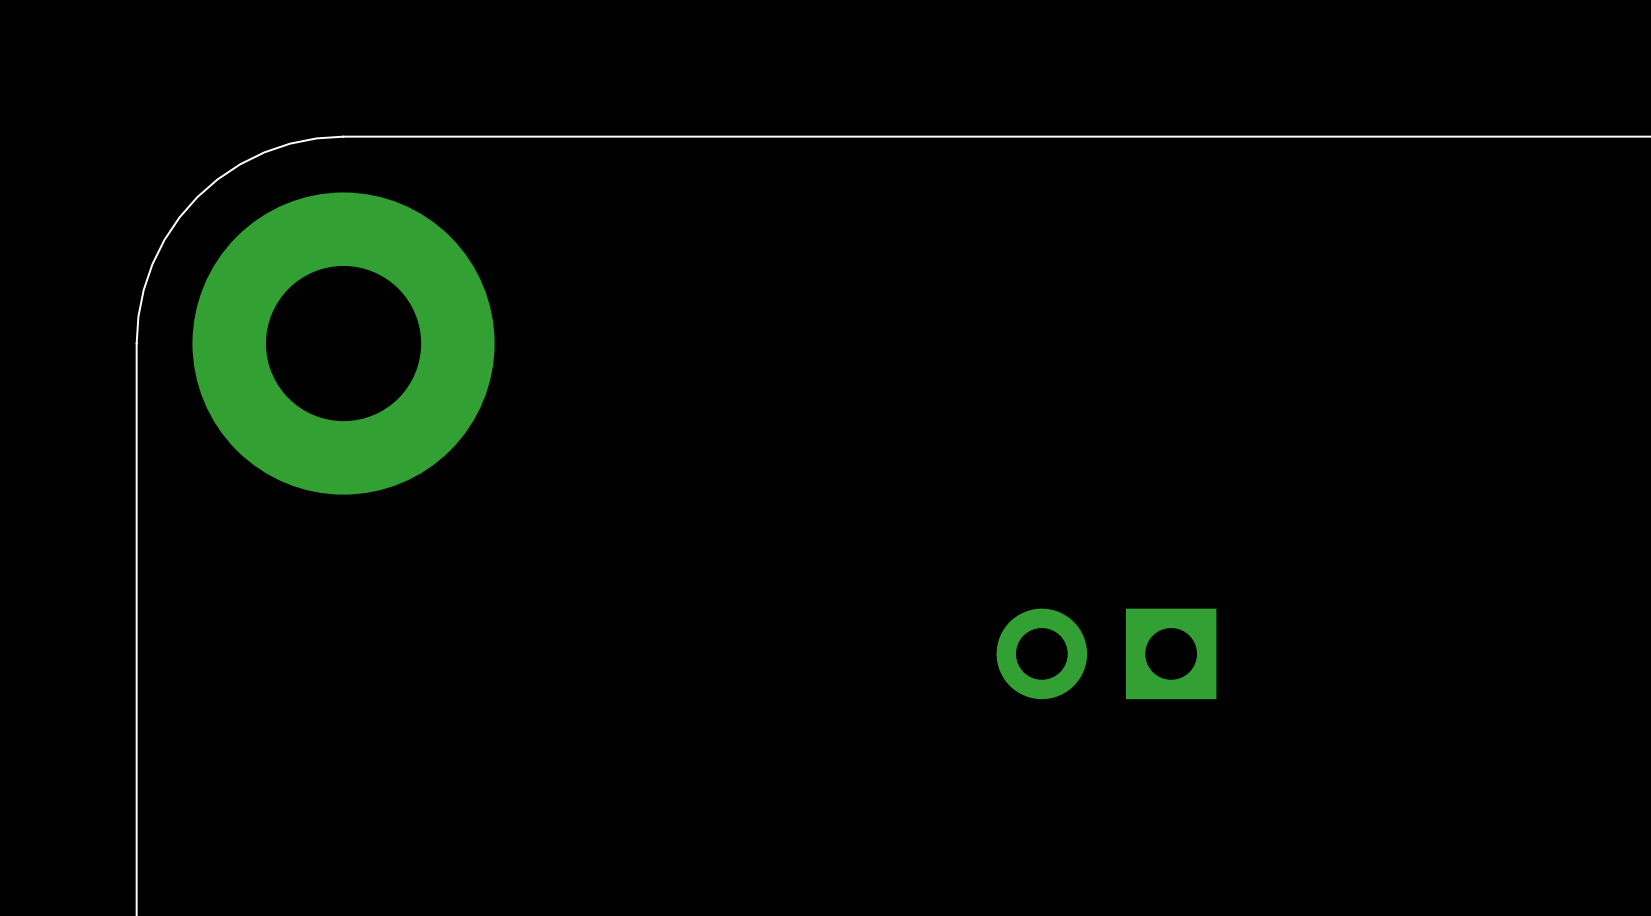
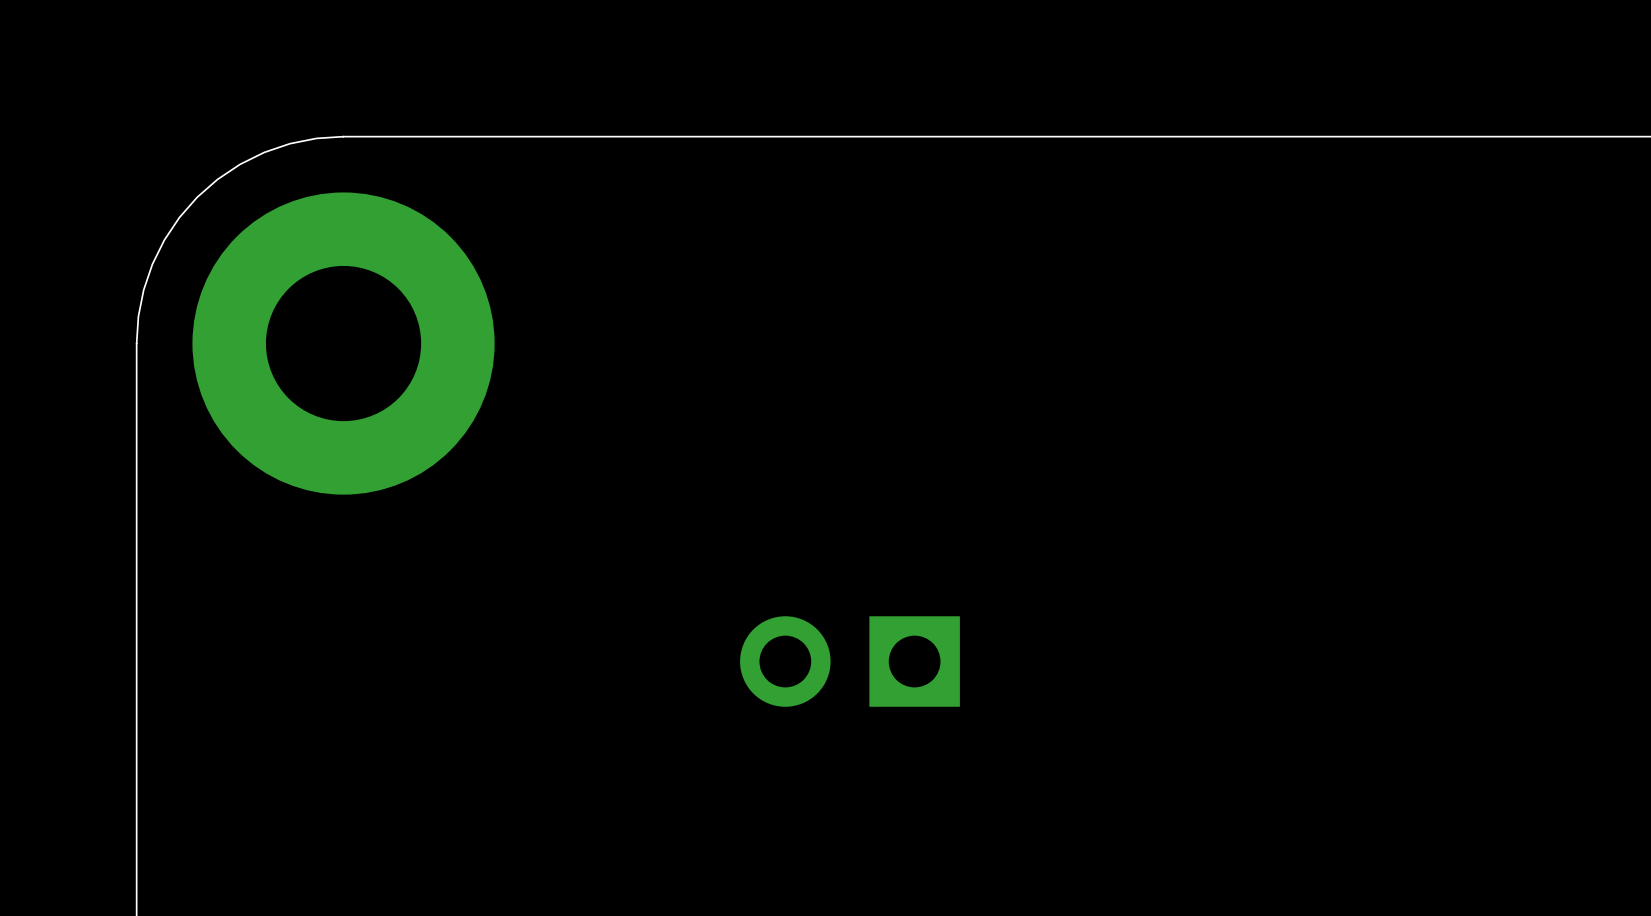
part position: (1106, 653) -> (849, 661)

